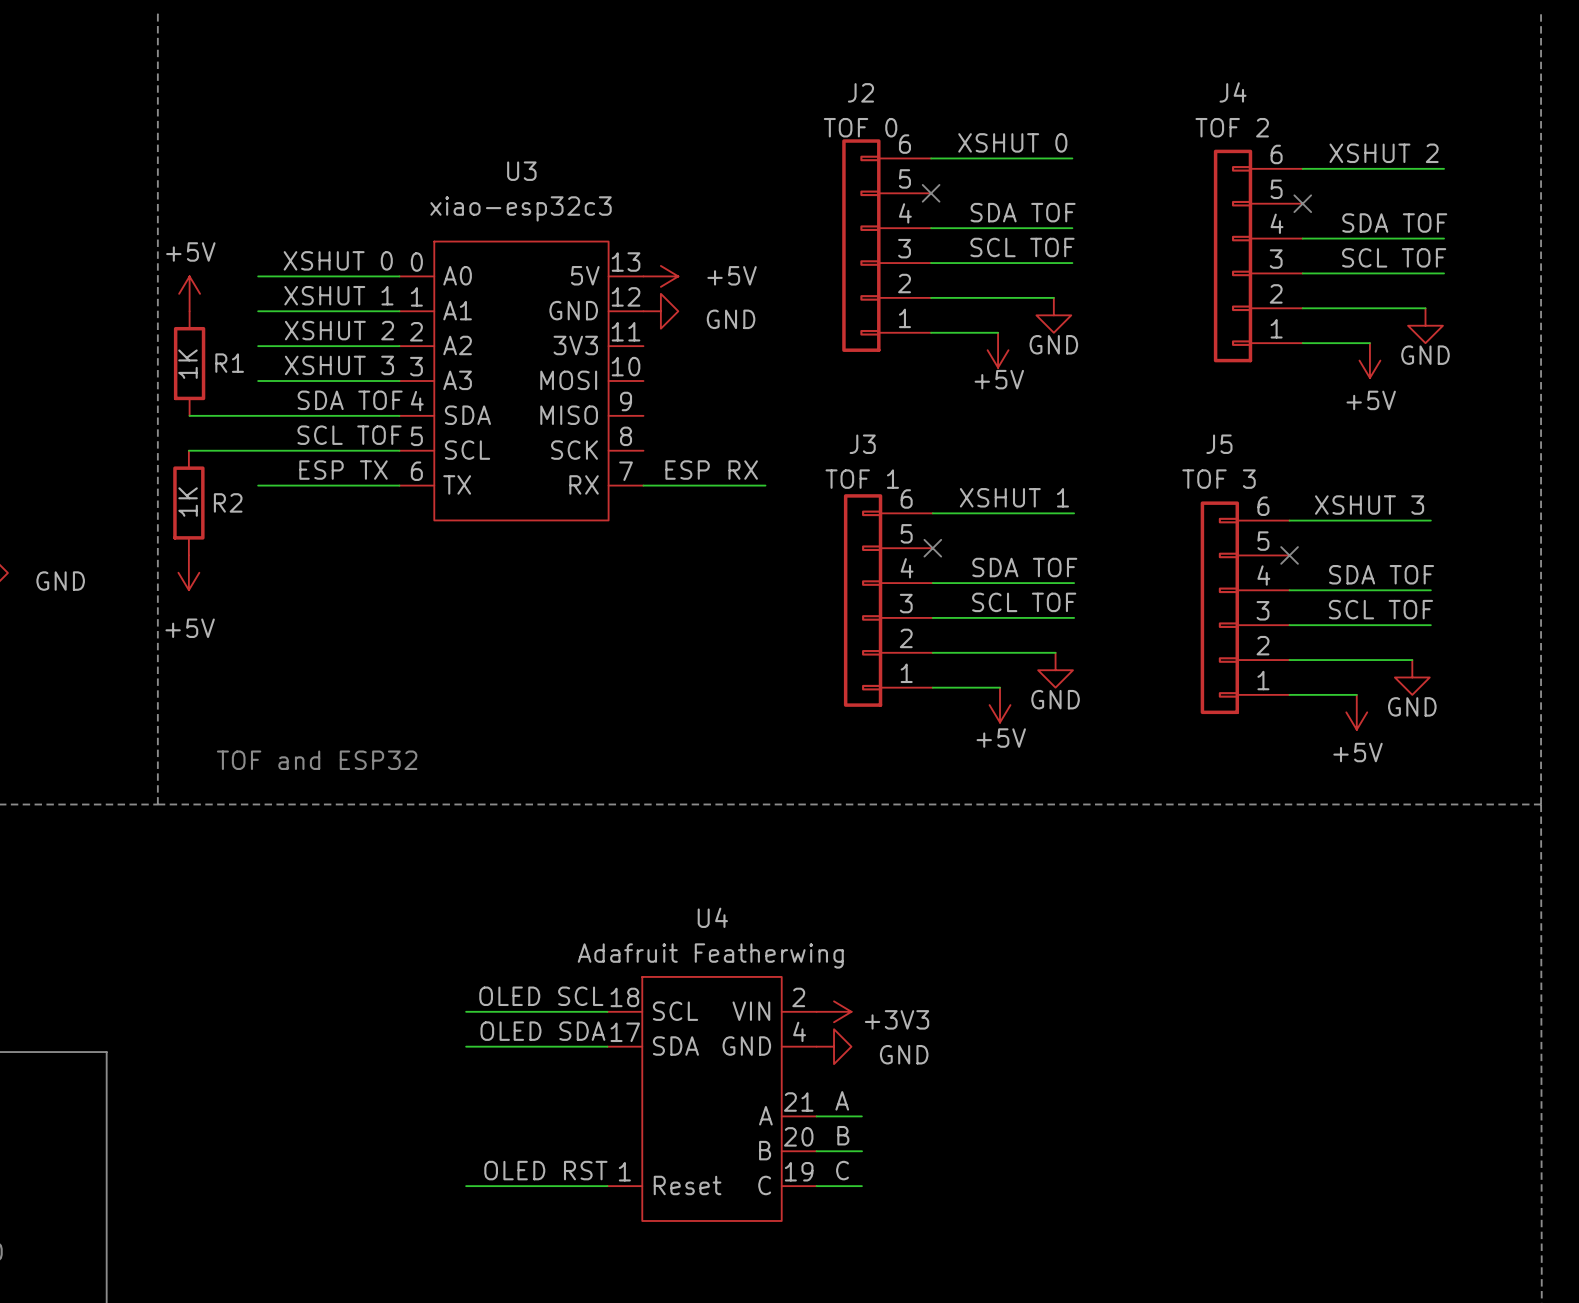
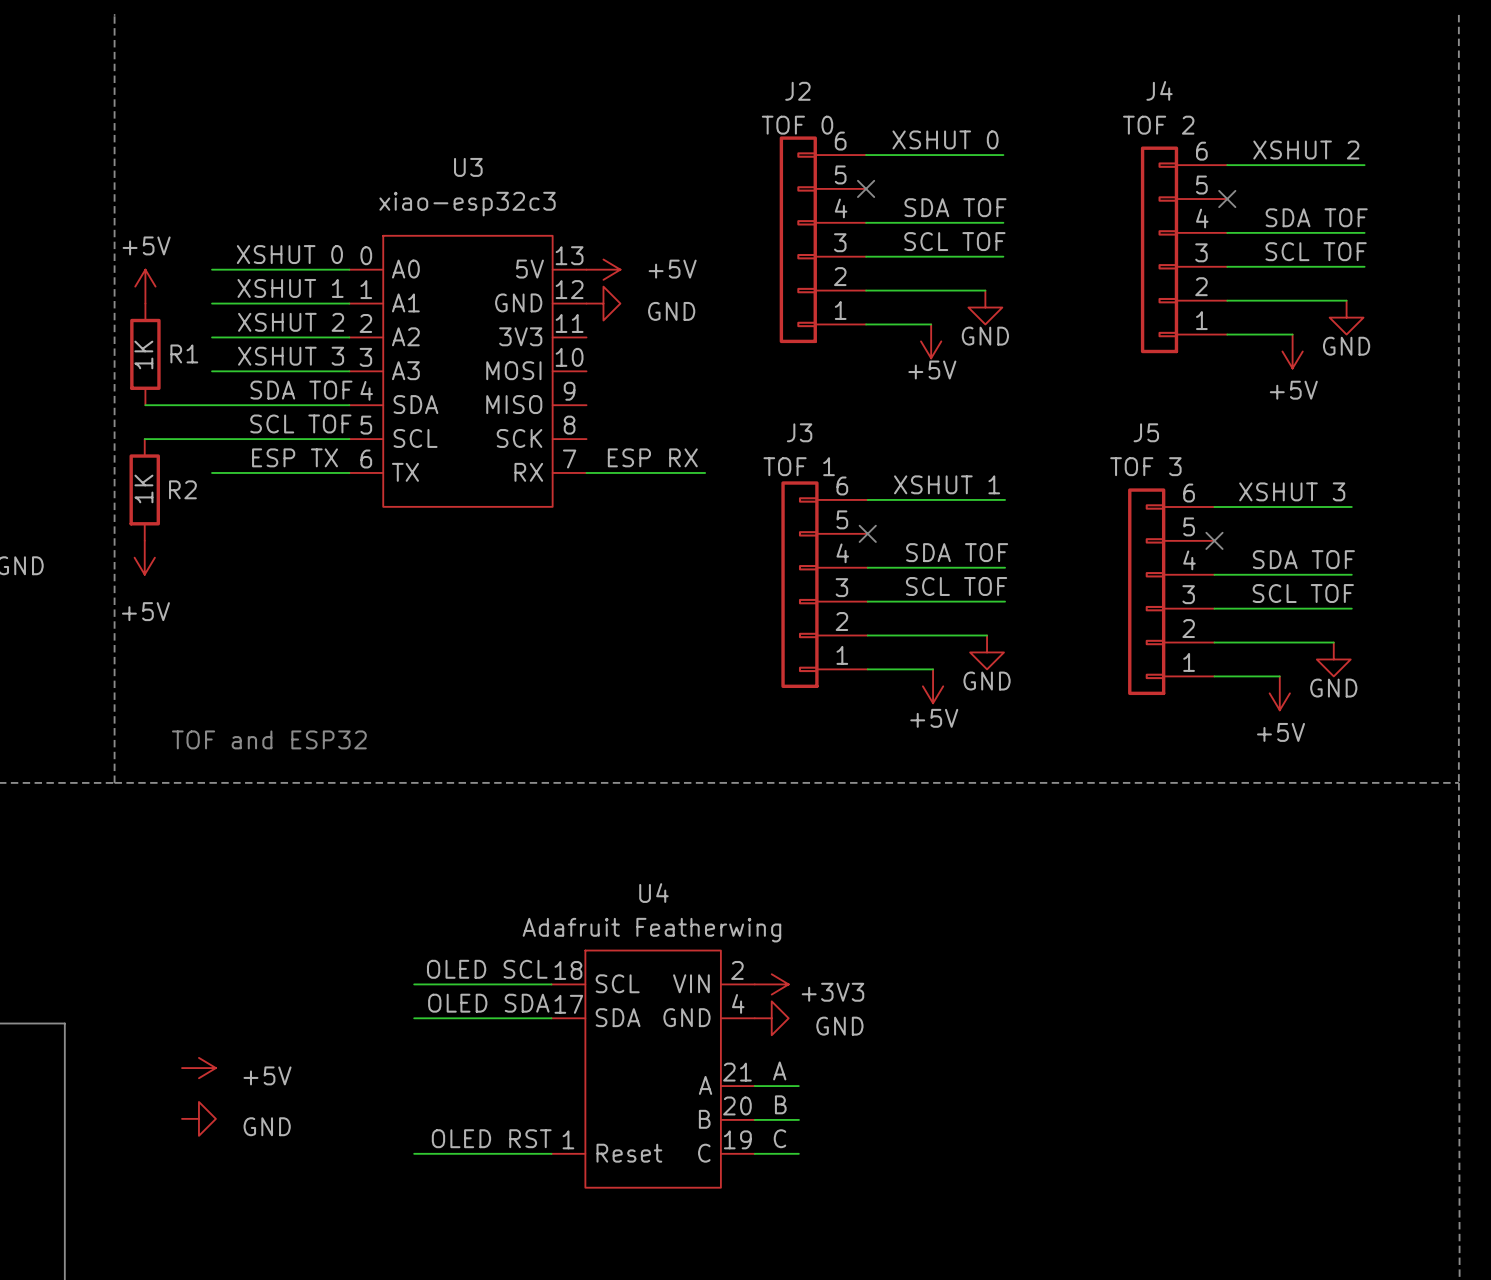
power symbol: none -> +5V (198, 1068)
power symbol: none -> GND (198, 1118)

